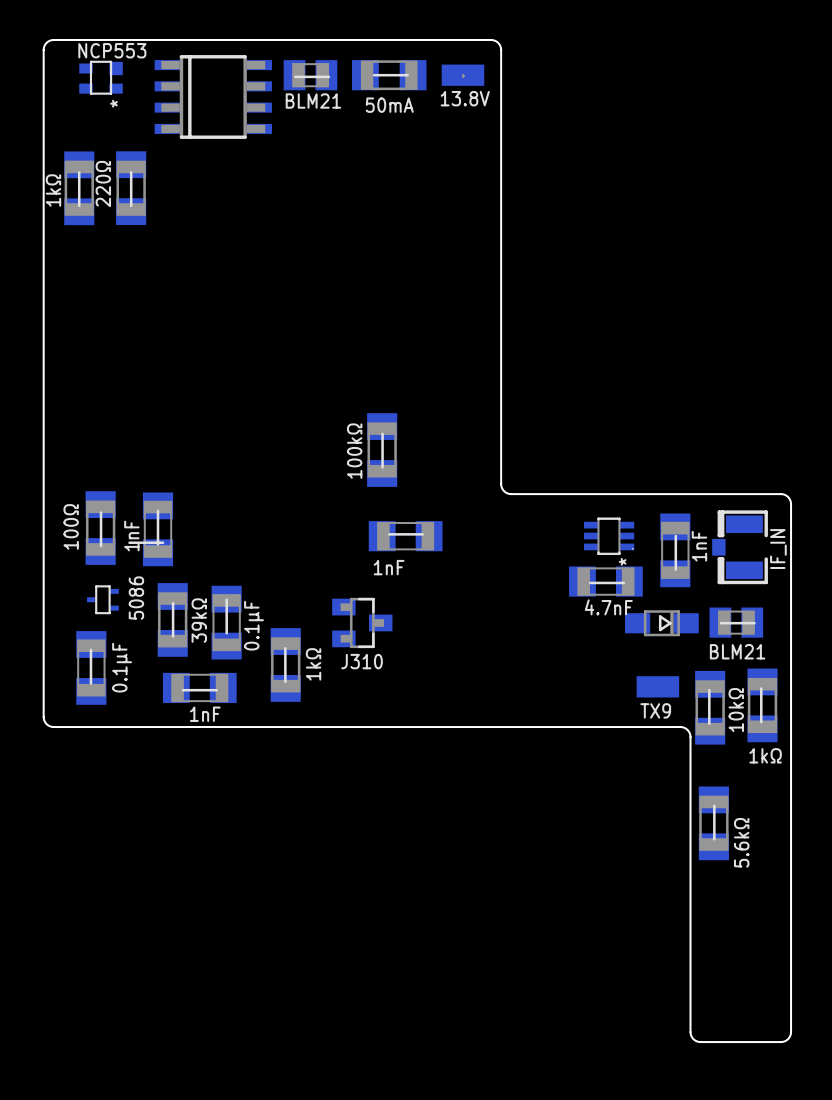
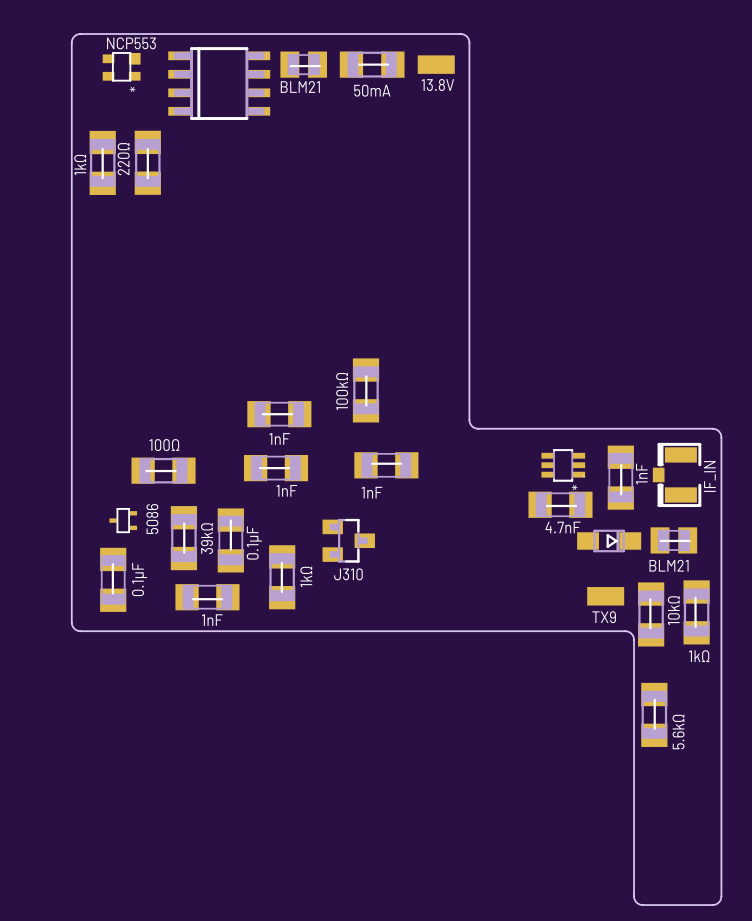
part: none -> 1nF (279, 414)
line: none -> (292, 414) (262, 414)
part footprint: [142, 492, 174, 567] -> [131, 457, 196, 484]
line: (158, 510) (158, 544) -> none
line: (101, 512) (101, 546) -> none
part: 100Ω (100, 528) -> none
part value: 1nF (131, 535) -> 100Ω (164, 445)
part: none -> 1nF (276, 468)
line: none -> (289, 468) (260, 468)

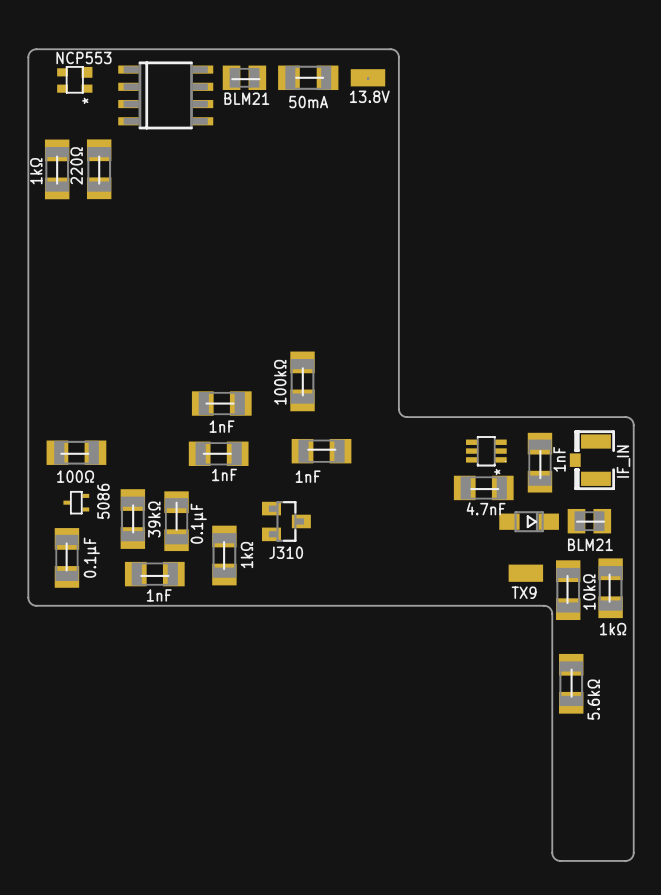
part value position: 100Ω (164, 445) -> 100Ω (75, 476)
part position: (163, 470) -> (76, 452)
line: (175, 471) (146, 471) -> (88, 453) (61, 453)

